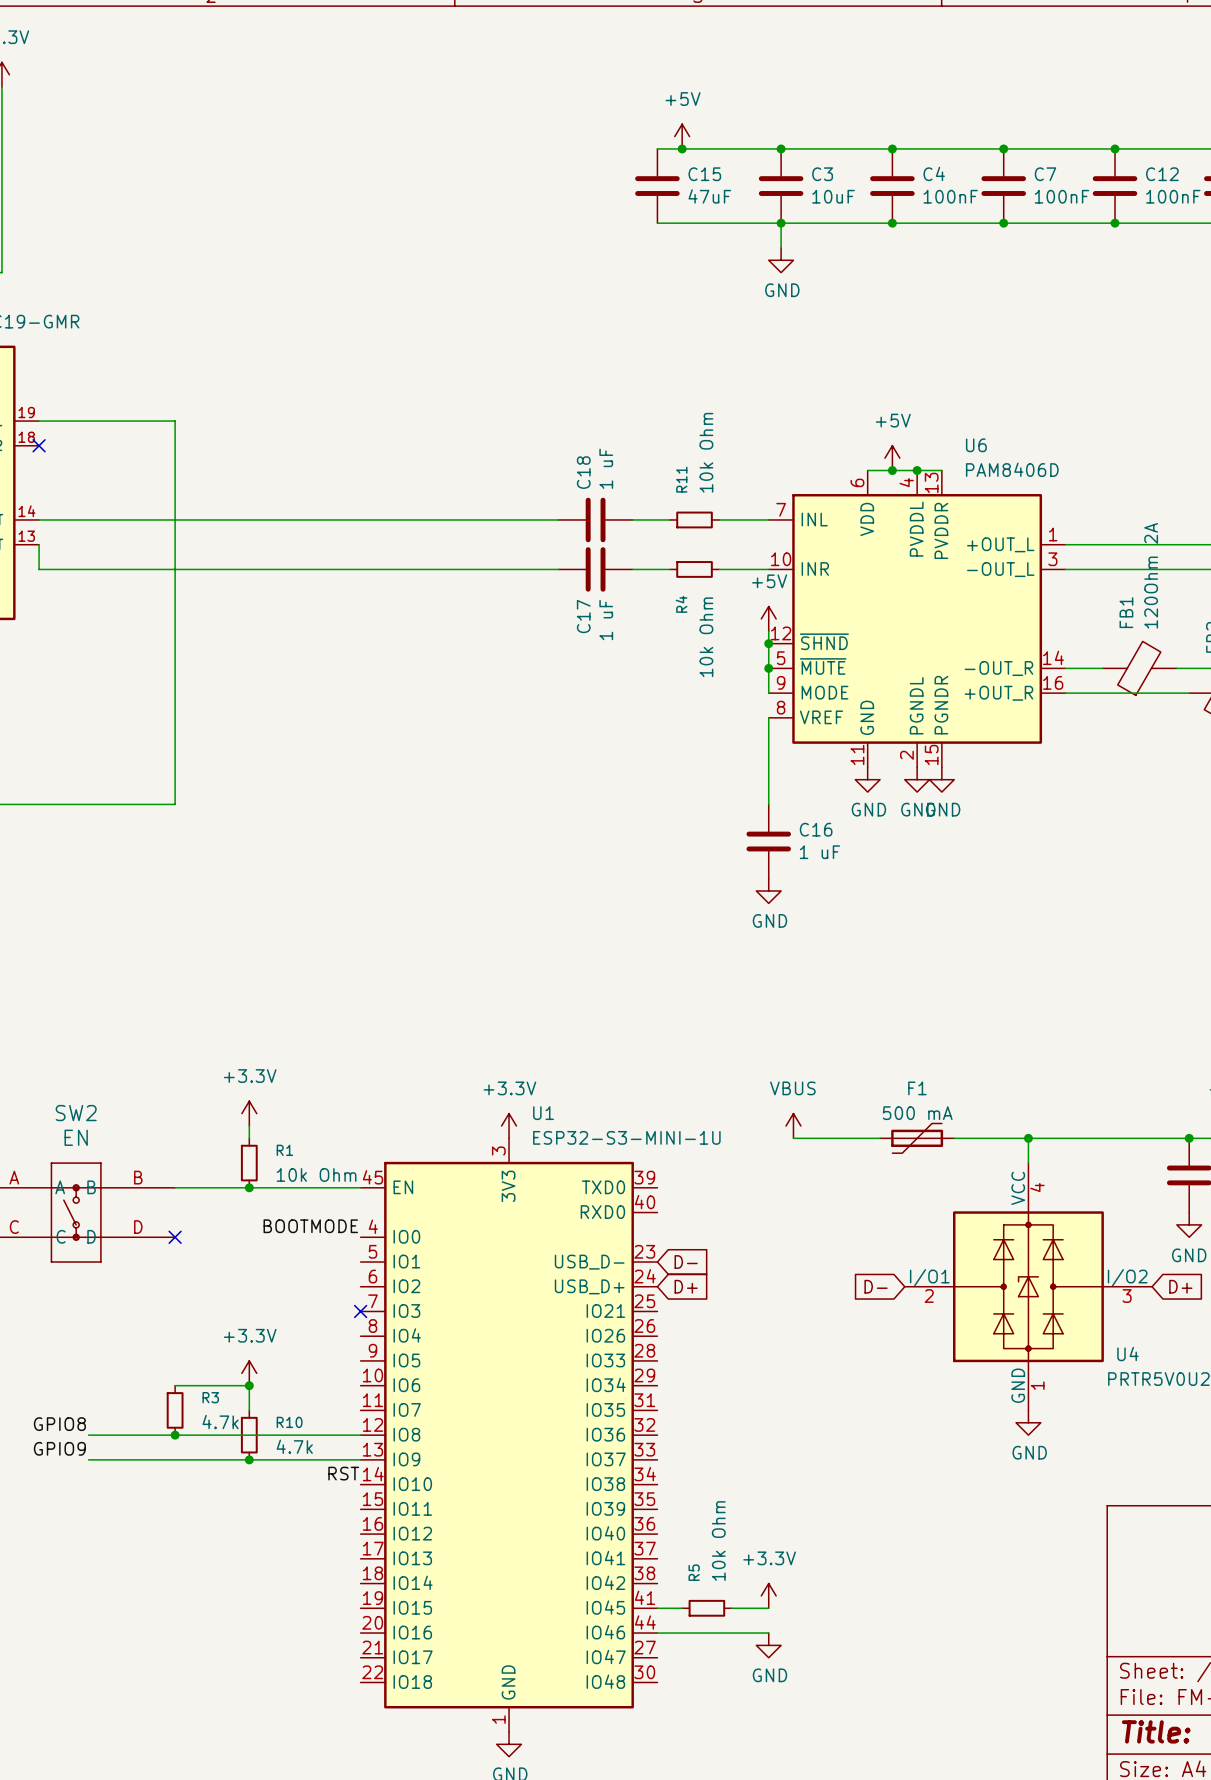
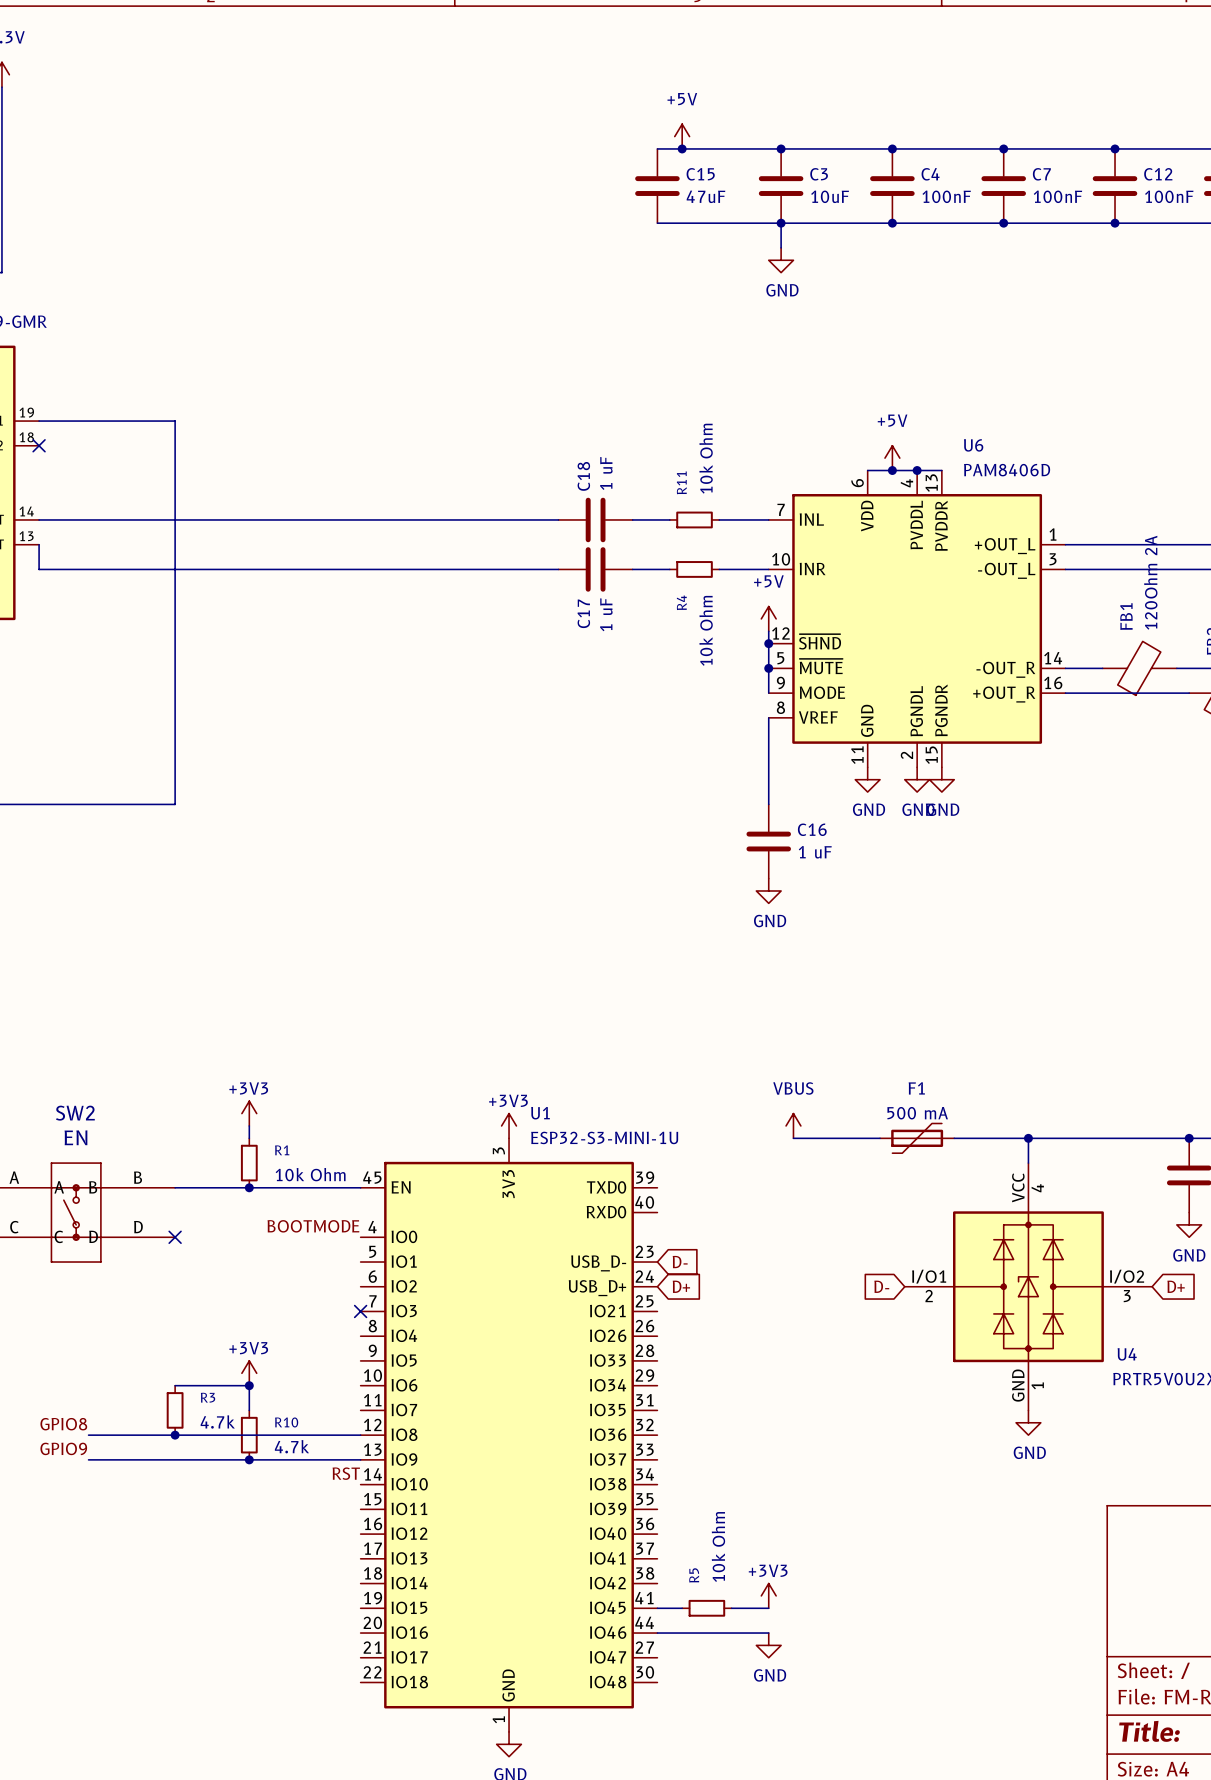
power symbol: +3.3V (249, 1113) -> +3V3 (249, 1113)
power symbol: +3.3V (509, 1125) -> +3V3 (509, 1125)
power symbol: +3.3V (249, 1373) -> +3V3 (249, 1373)
power symbol: +3.3V (768, 1595) -> +3V3 (768, 1595)

